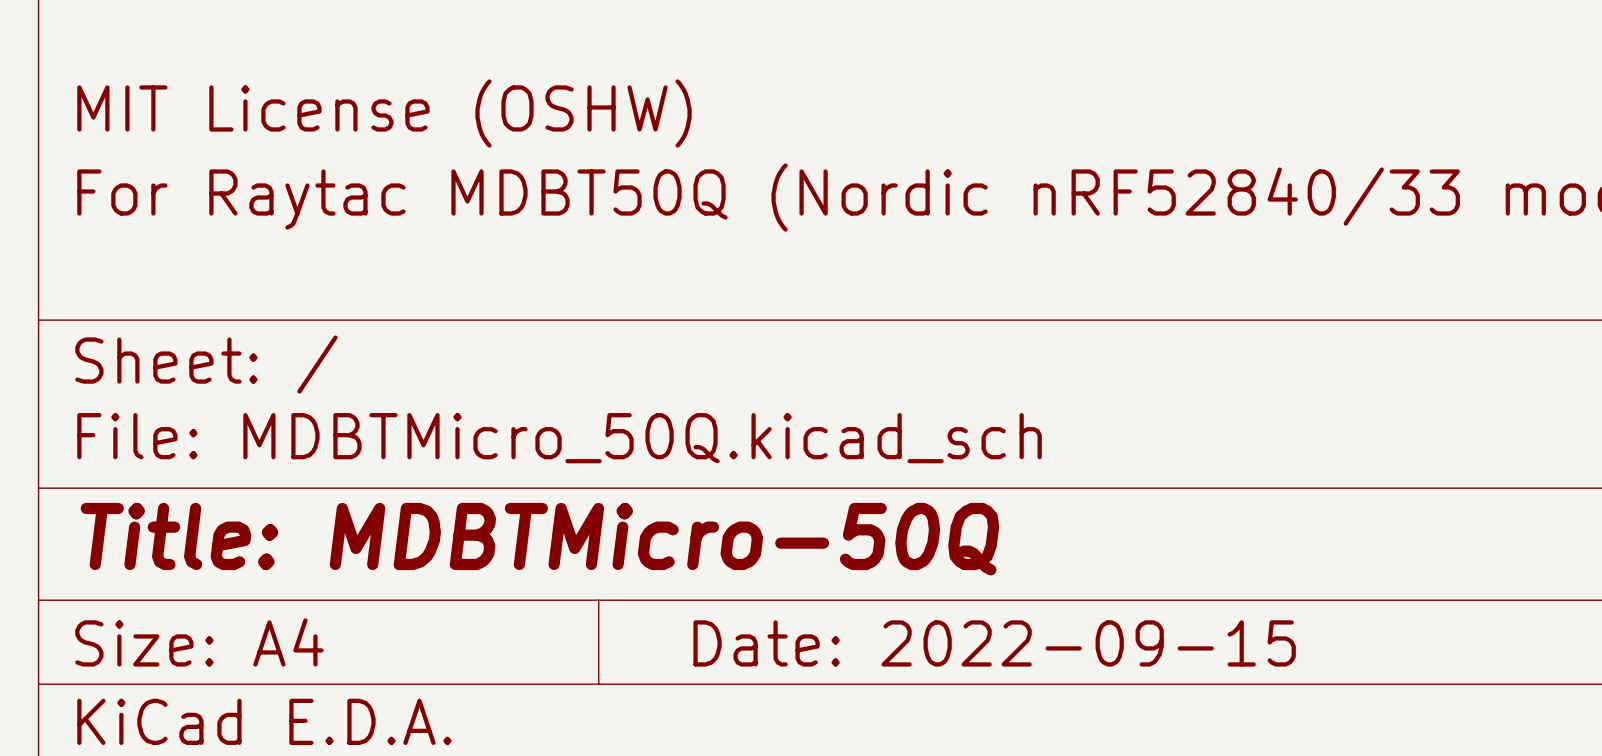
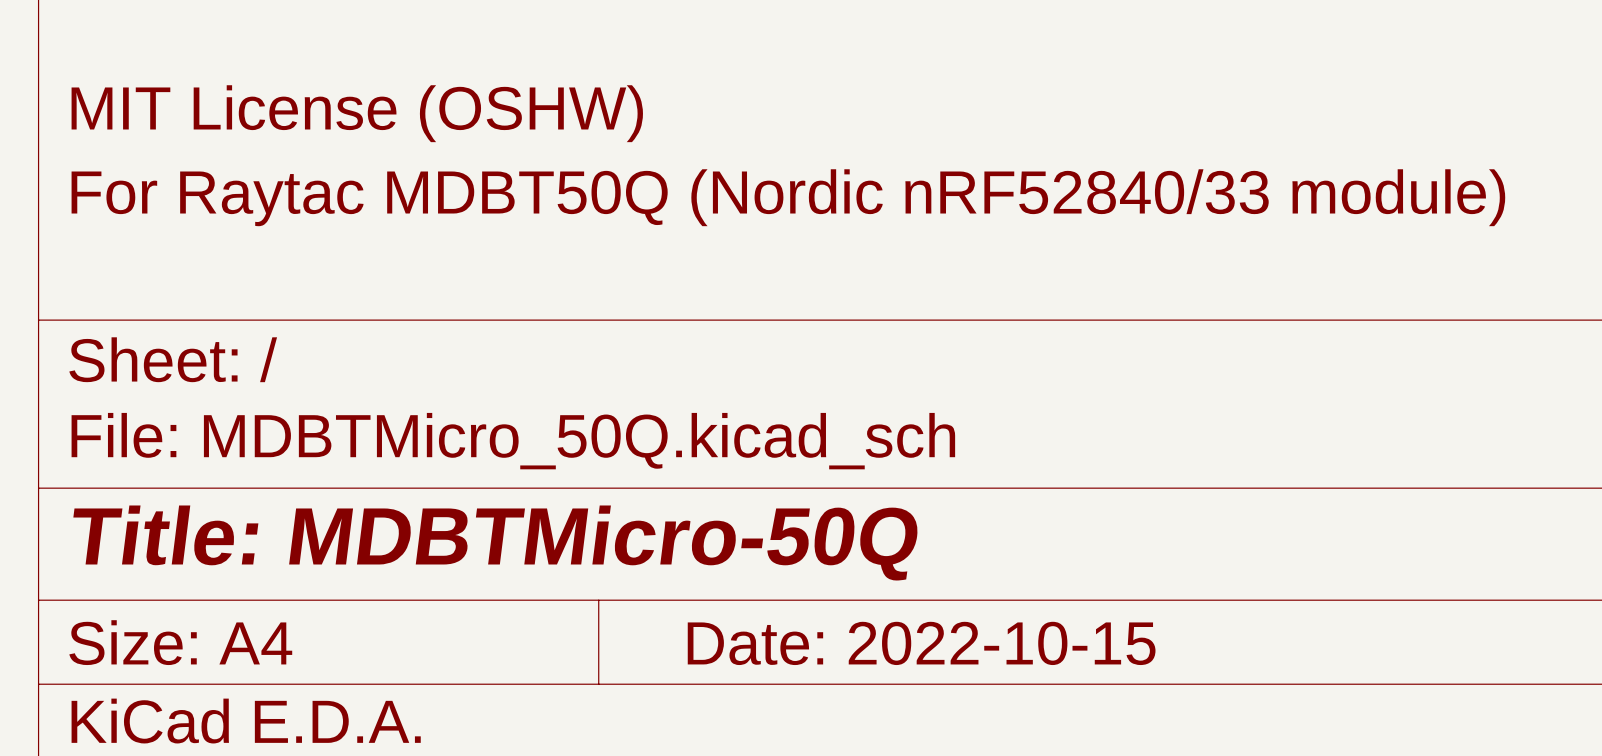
title block: Date: 2022-09-15 (994, 643) -> Date: 2022-10-15 (921, 643)

